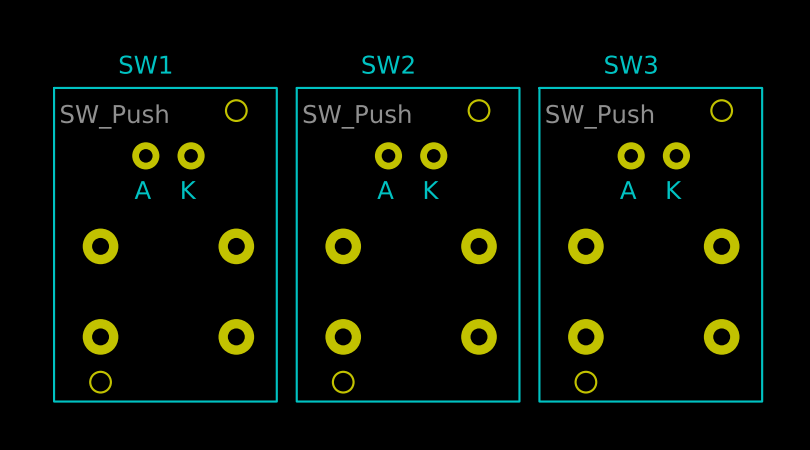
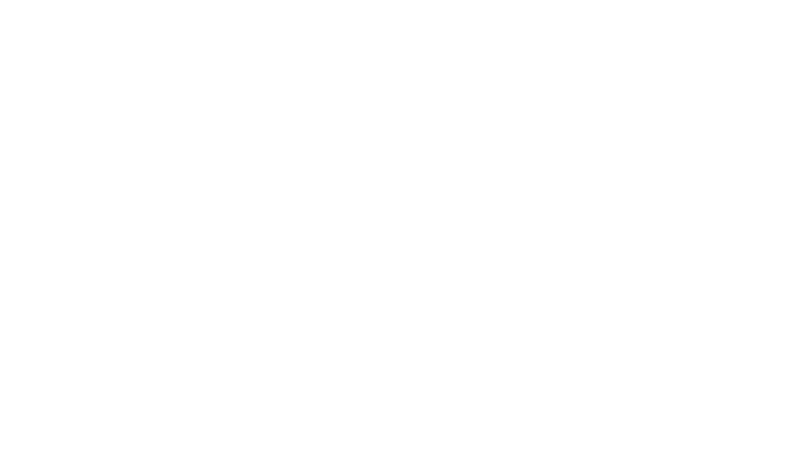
SW1: SW_Push (165, 244) -> none
SW2: SW_Push (408, 244) -> none
SW3: SW_Push (650, 244) -> none

